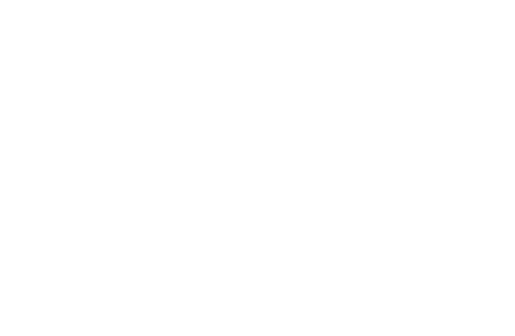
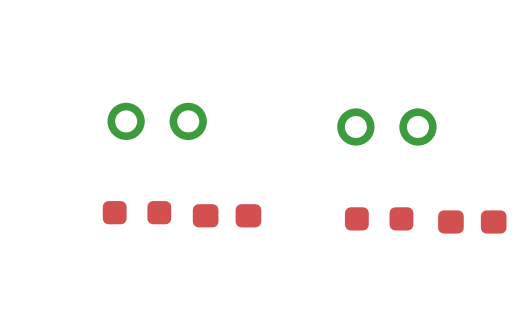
part: none -> (157, 121)
part: none -> (386, 126)
part: none -> (136, 212)
part: none -> (227, 215)
part: none -> (379, 218)
part: none -> (472, 221)

